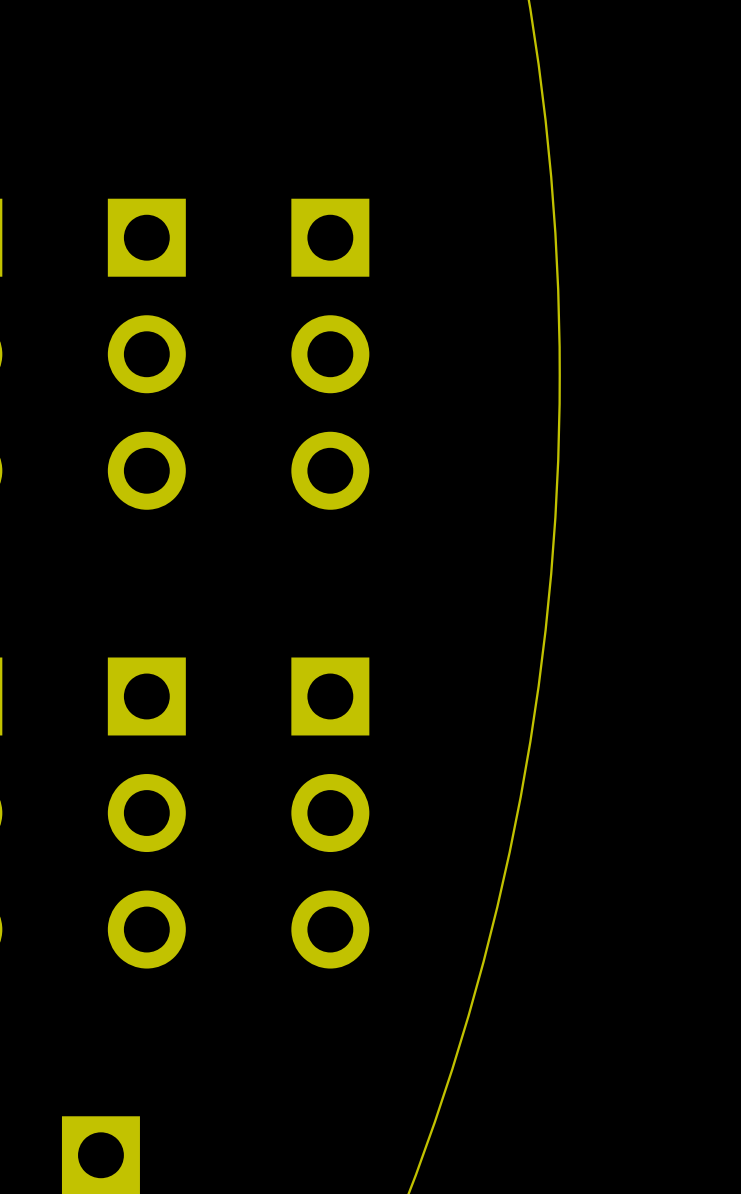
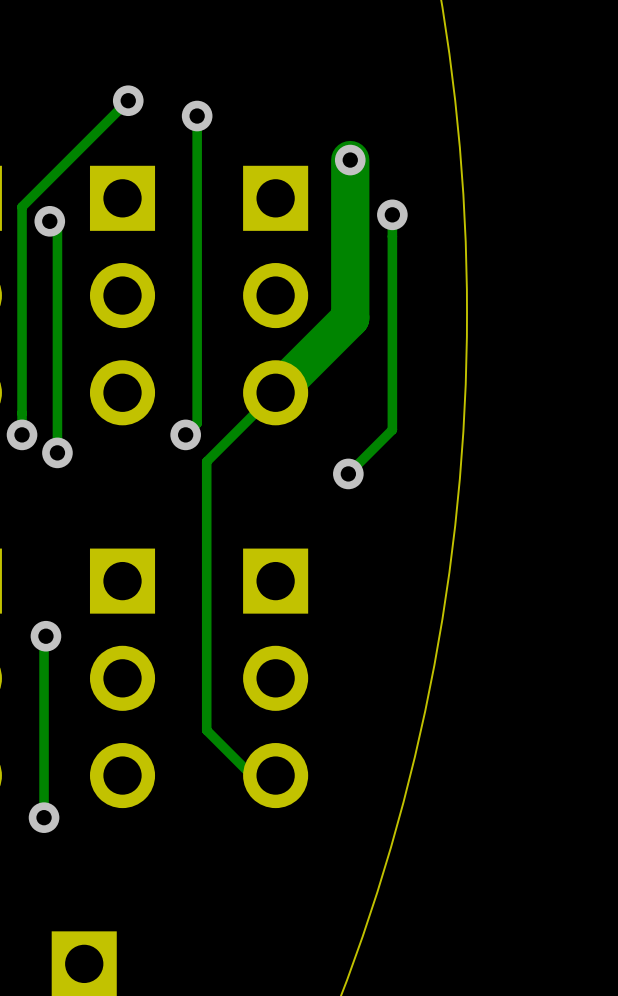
track: none -> (128, 100) (22, 206) (22, 434)
via: none -> (128, 100)
track: none -> (197, 116) (197, 423) (185, 434)
via: none -> (197, 116)
track: none -> (350, 160) (350, 318) (206, 461) (206, 730) (251, 775) (275, 775)
via: none -> (350, 160)
track: none -> (392, 214) (392, 429) (348, 473)
via: none -> (392, 214)
track: none -> (49, 221) (57, 228) (57, 452)
via: none -> (49, 221)
via: none -> (22, 434)
via: none -> (185, 434)
via: none -> (57, 452)
via: none -> (348, 473)
track: none -> (45, 636) (44, 638) (44, 817)
via: none -> (45, 636)
via: none -> (44, 817)

